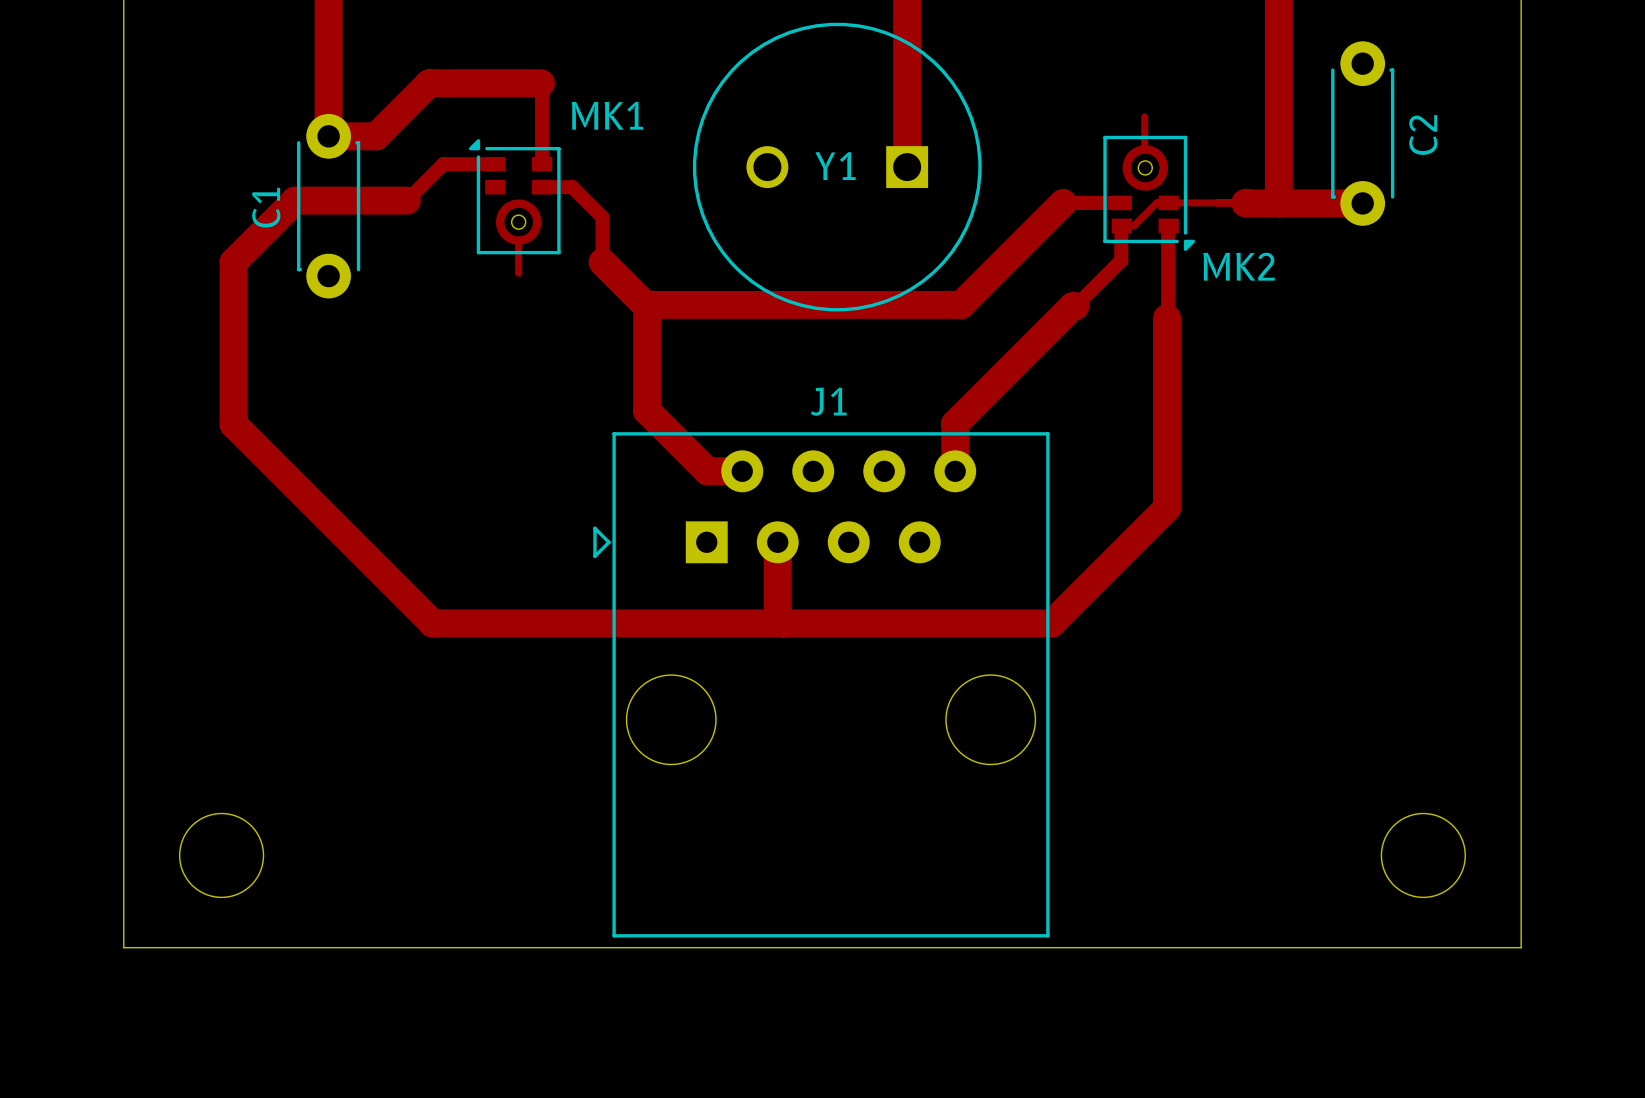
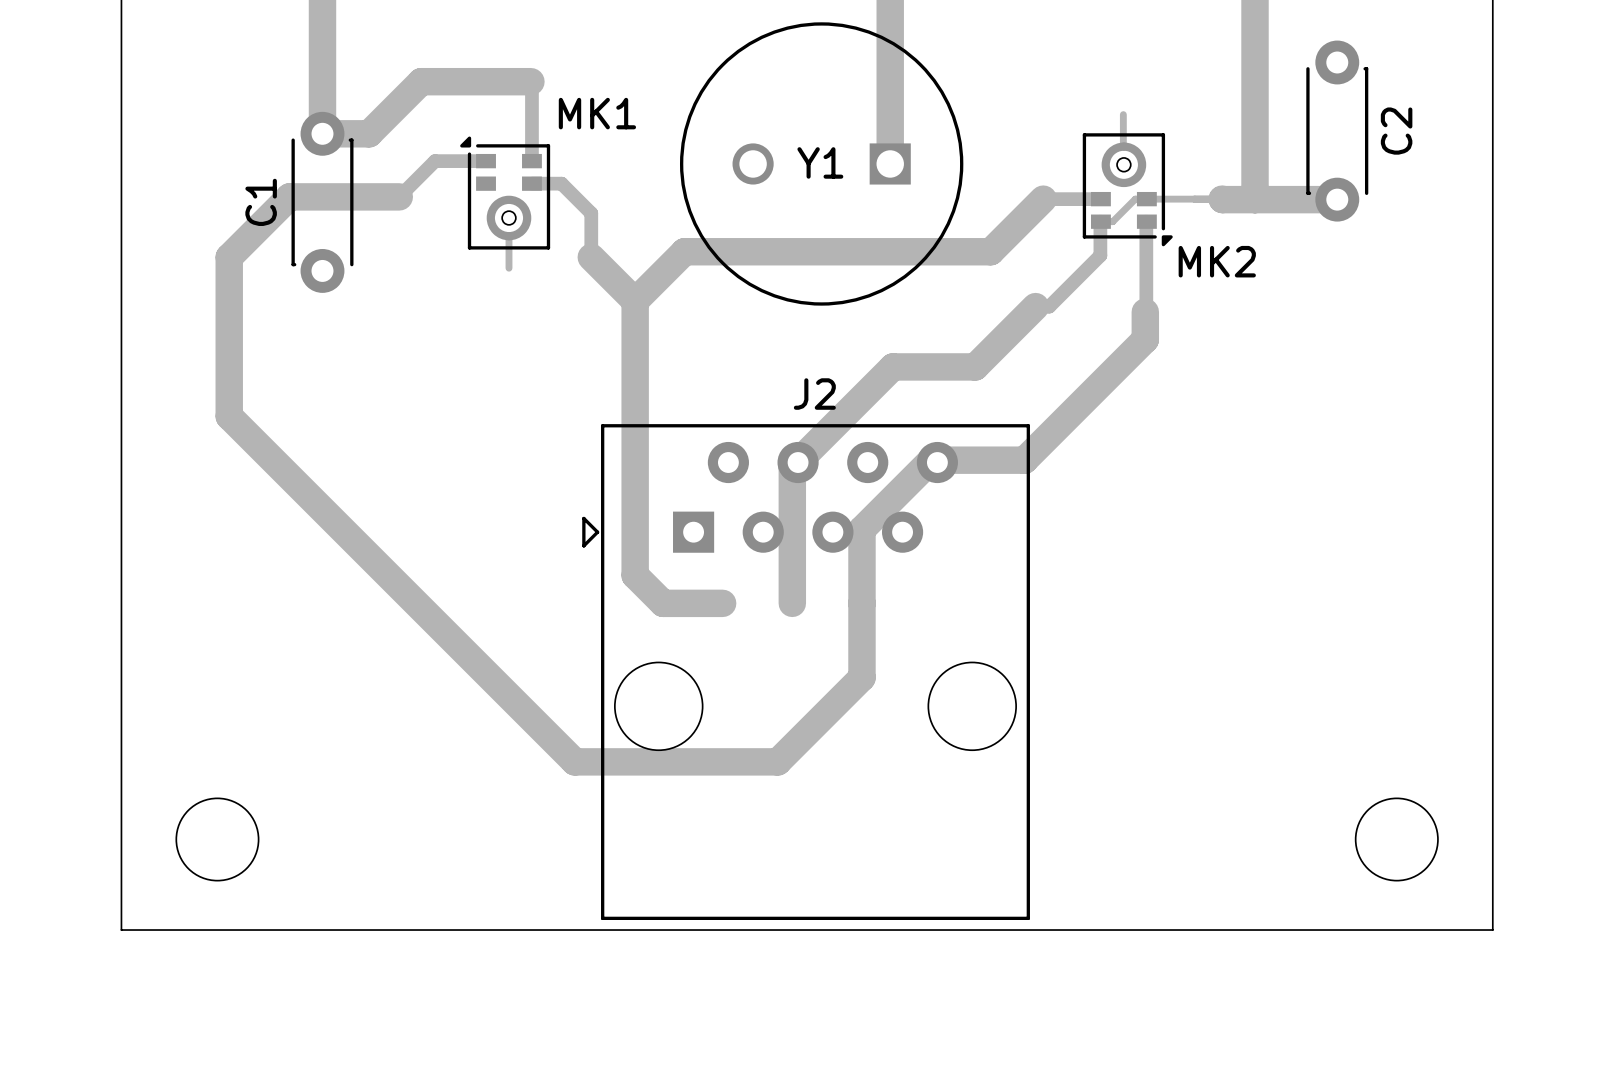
track: (1009, 256) (961, 304) (649, 304) -> (990, 251) (684, 251) (637, 299)
track: (1075, 306) (1072, 306) (955, 423) (955, 471) -> (1055, 300) (1049, 306) (1035, 306) (975, 366) (892, 366) (792, 467) (792, 603)
track: (1167, 345) (1167, 508) (1051, 623) (432, 623) -> (1145, 339) (1024, 460) (931, 460) (861, 529) (861, 677) (777, 761) (574, 761) (424, 611)
J1 name: J1 (828, 401) -> J2 (814, 394)
track: (647, 411) (707, 471) (742, 471) -> (635, 403) (635, 575) (663, 603) (722, 603)
track: (777, 542) (777, 617) (783, 623) -> none

